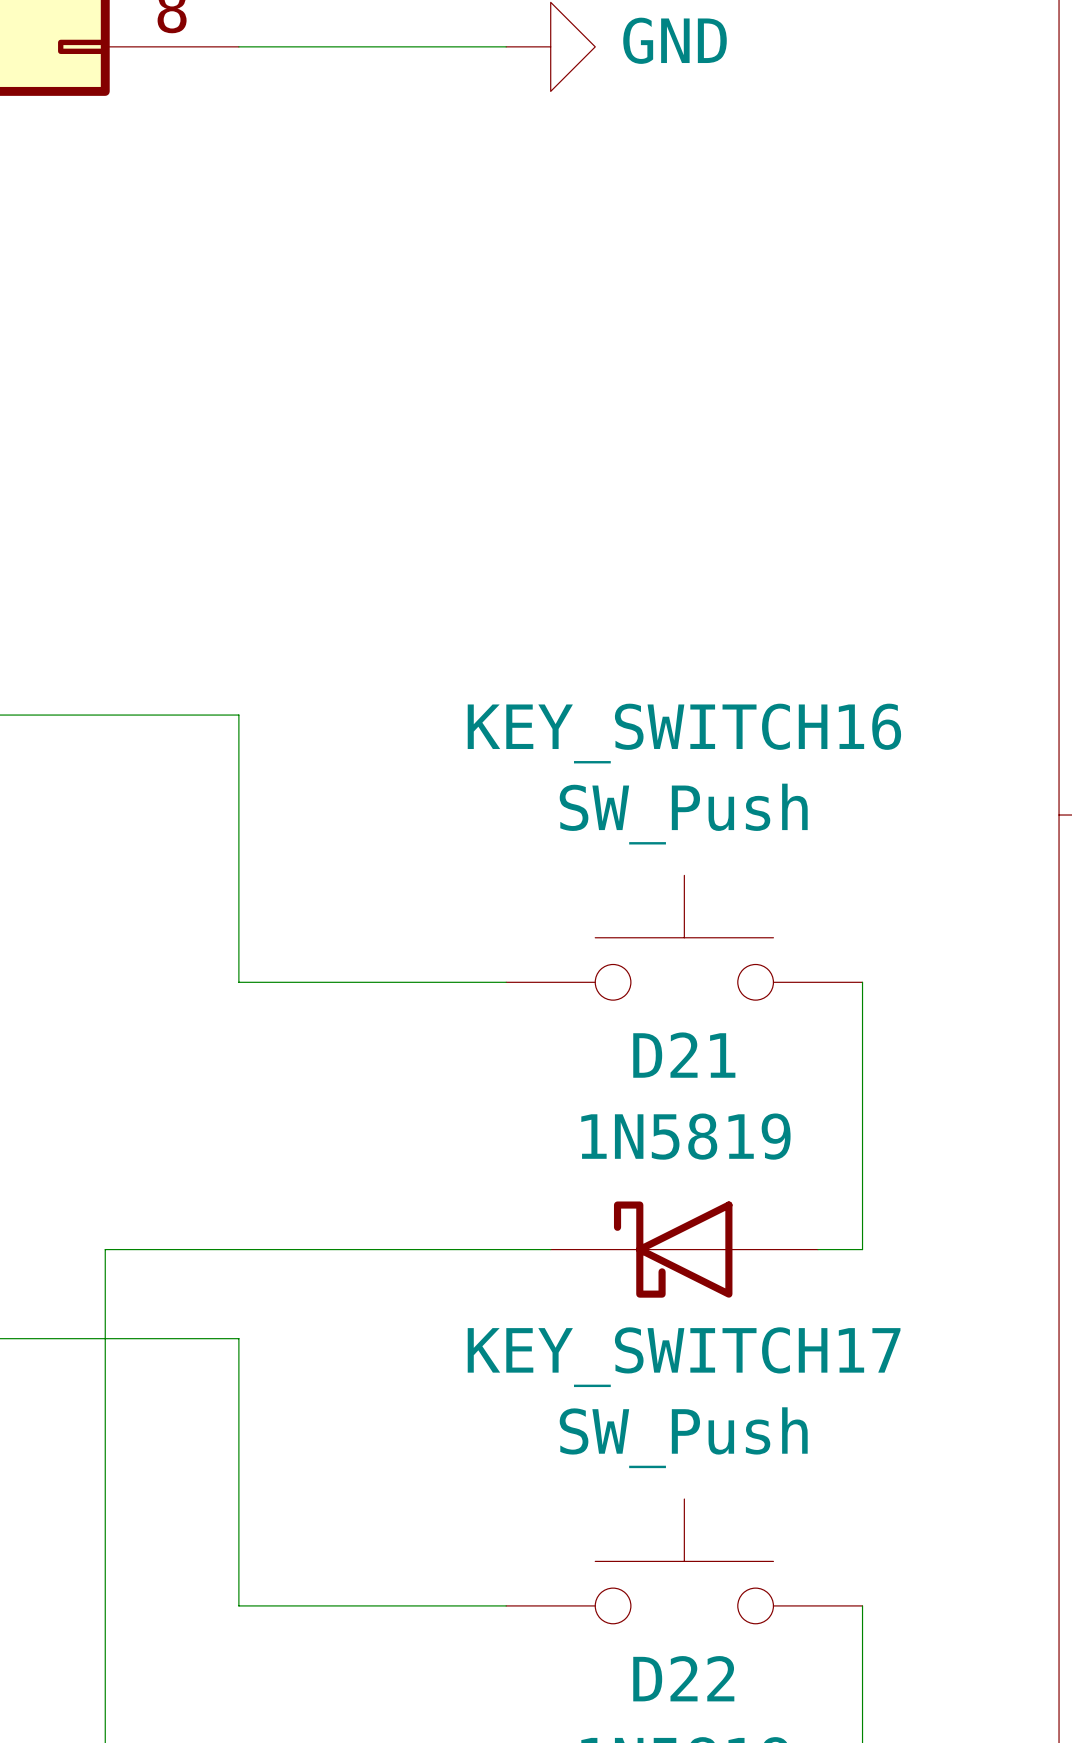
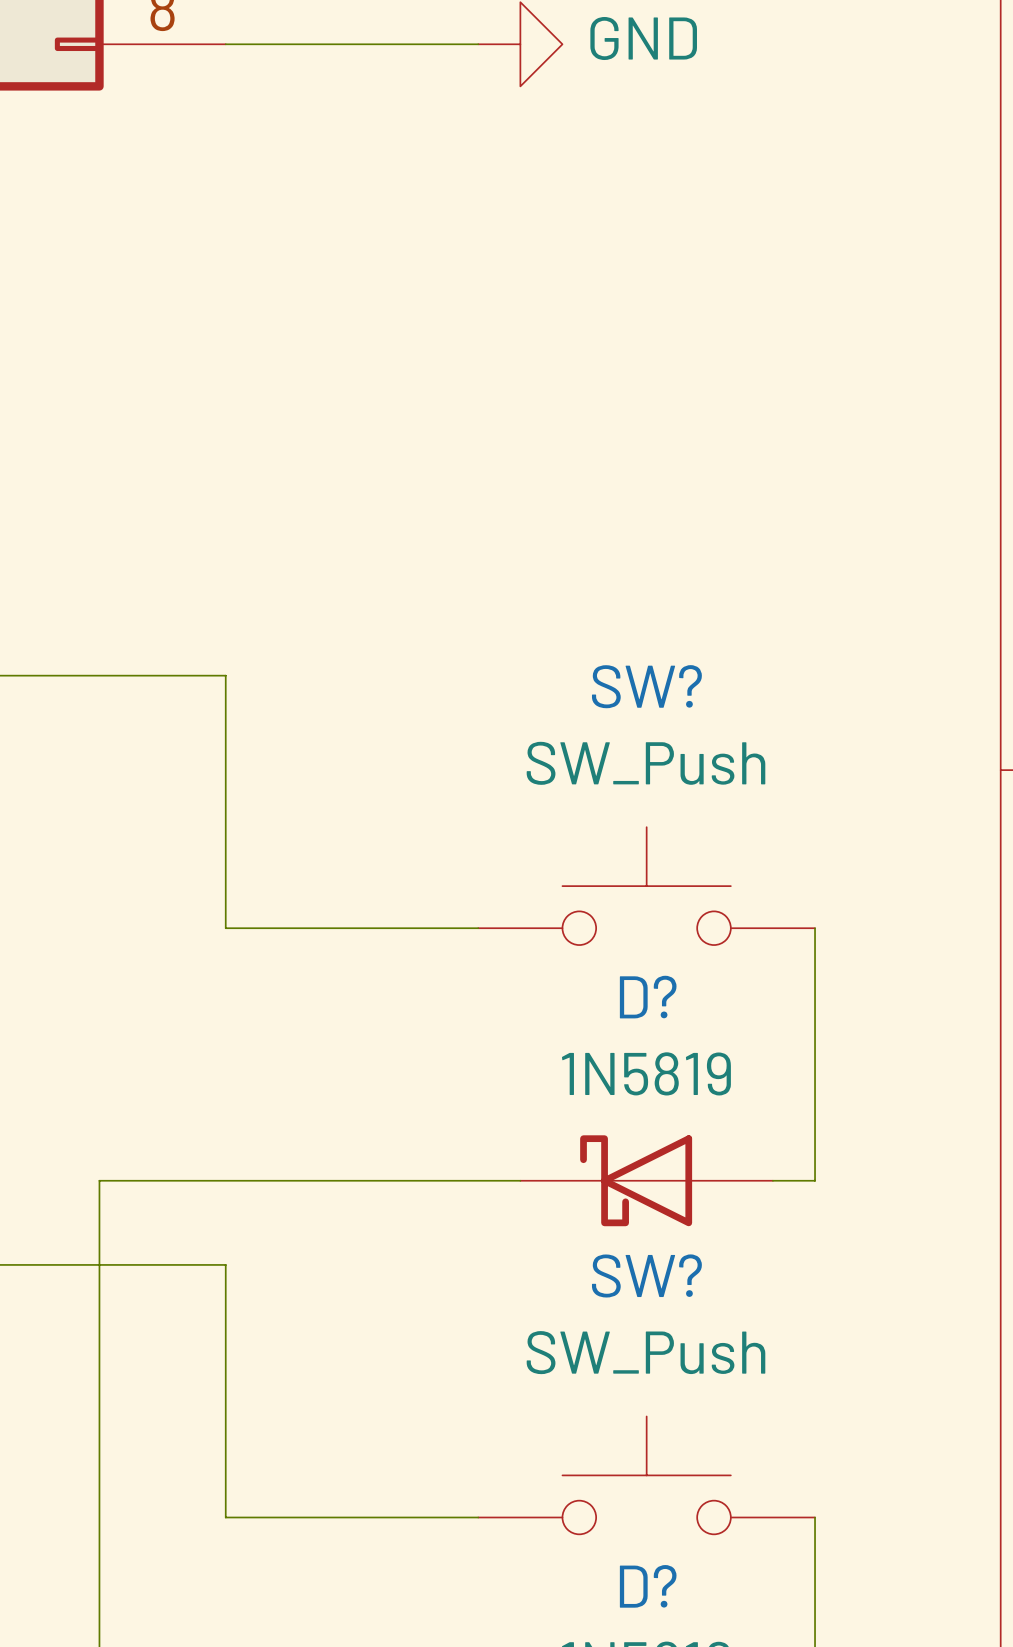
KEY_SWITCH16 name: KEY_SWITCH16 (684, 733) -> SW? (646, 686)
D21 name: D21 (684, 1055) -> D? (648, 997)
KEY_SWITCH17 name: KEY_SWITCH17 (684, 1357) -> SW? (646, 1275)
D22 name: D22 (683, 1678) -> D? (648, 1586)

